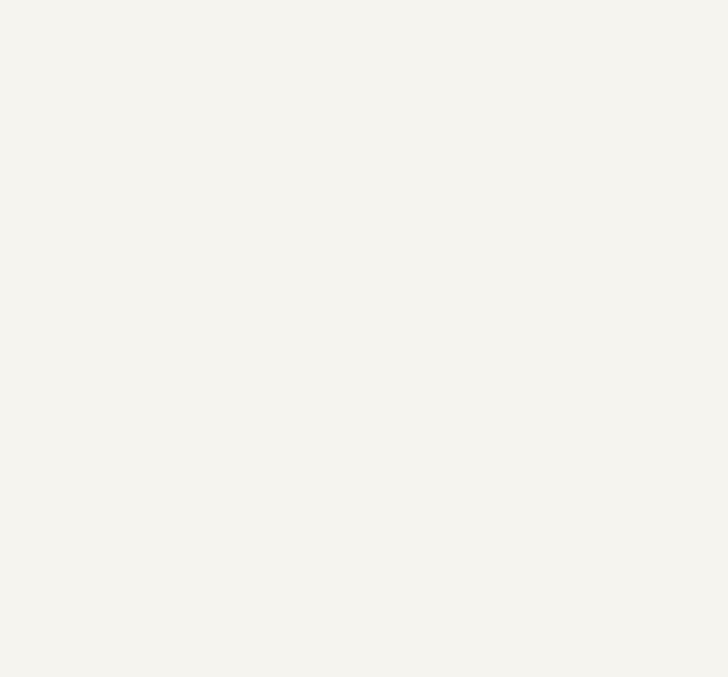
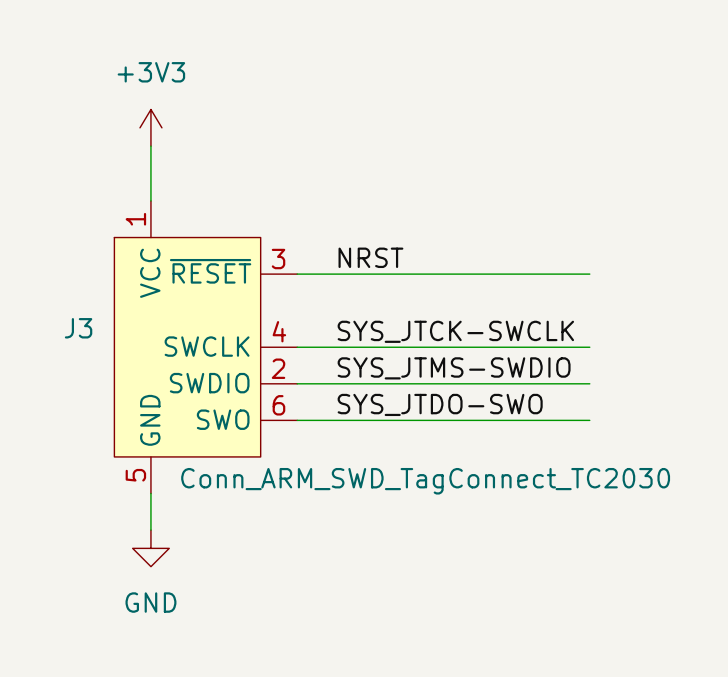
power symbol: none -> +3V3 (150, 127)
wire: none -> (150, 146) (150, 200)
label: none -> NRST (370, 257)
wire: none -> (297, 274) (589, 274)
label: none -> SYS_JTCK-SWCLK (455, 331)
J3: none -> Conn_ARM_SWD_TagConnect_TC2030 (205, 347)
wire: none -> (297, 347) (589, 347)
label: none -> SYS_JTMS-SWDIO (454, 368)
wire: none -> (297, 383) (589, 383)
label: none -> SYS_JTDO-SWO (440, 404)
wire: none -> (297, 420) (589, 420)
wire: none -> (150, 493) (150, 530)
power symbol: none -> GND (150, 548)

